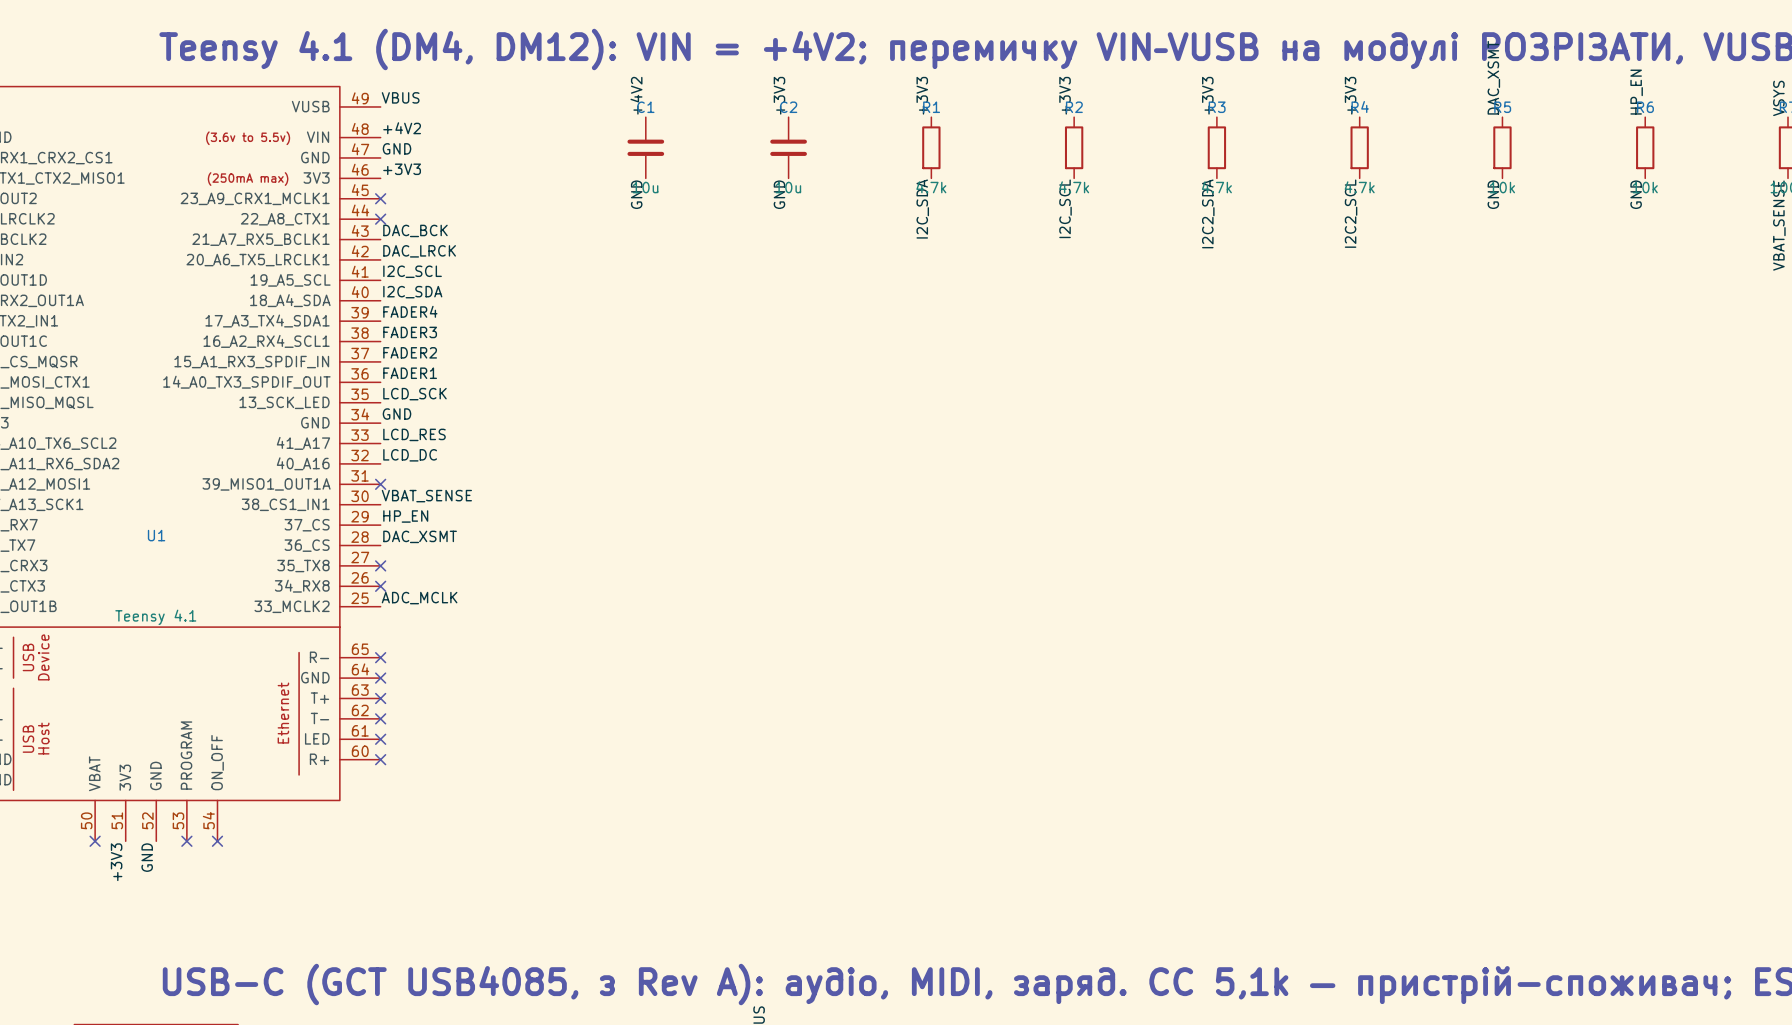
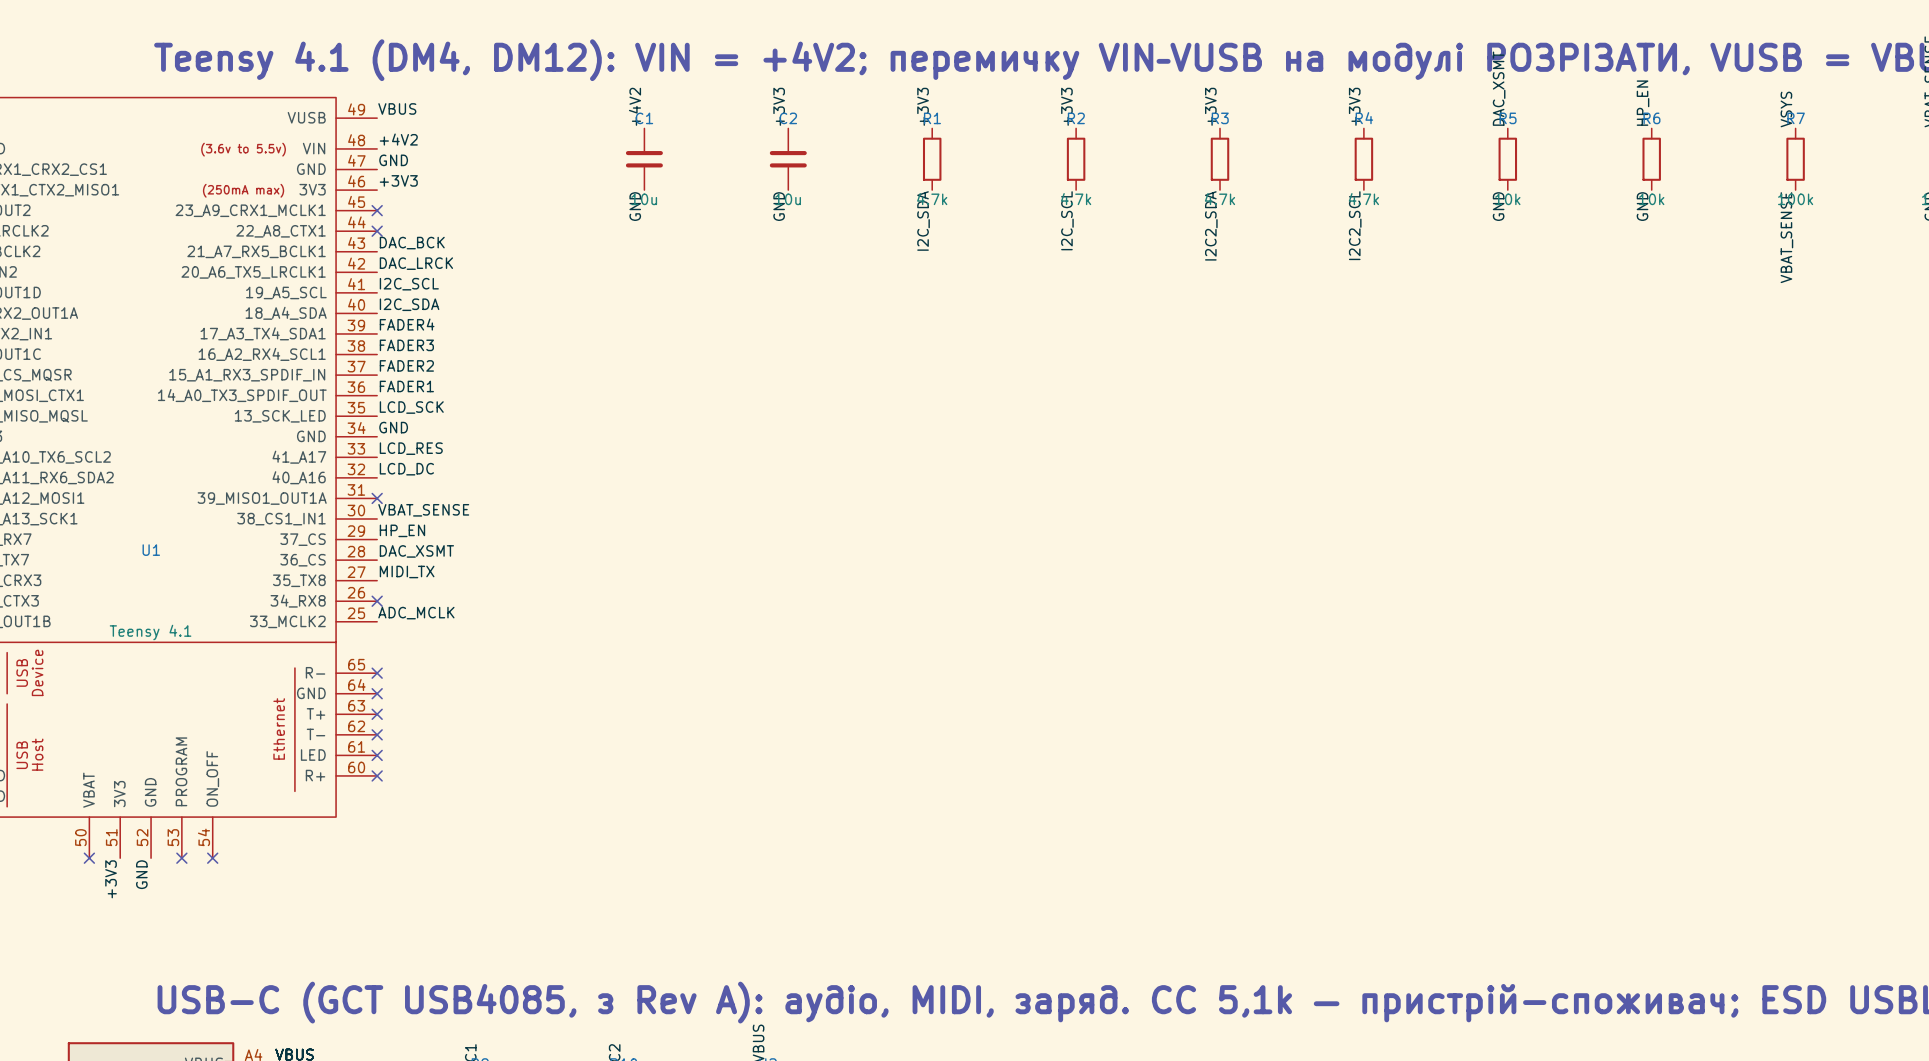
label: none -> MIDI_TX (407, 571)
no-connect mark: (380, 565) -> none

